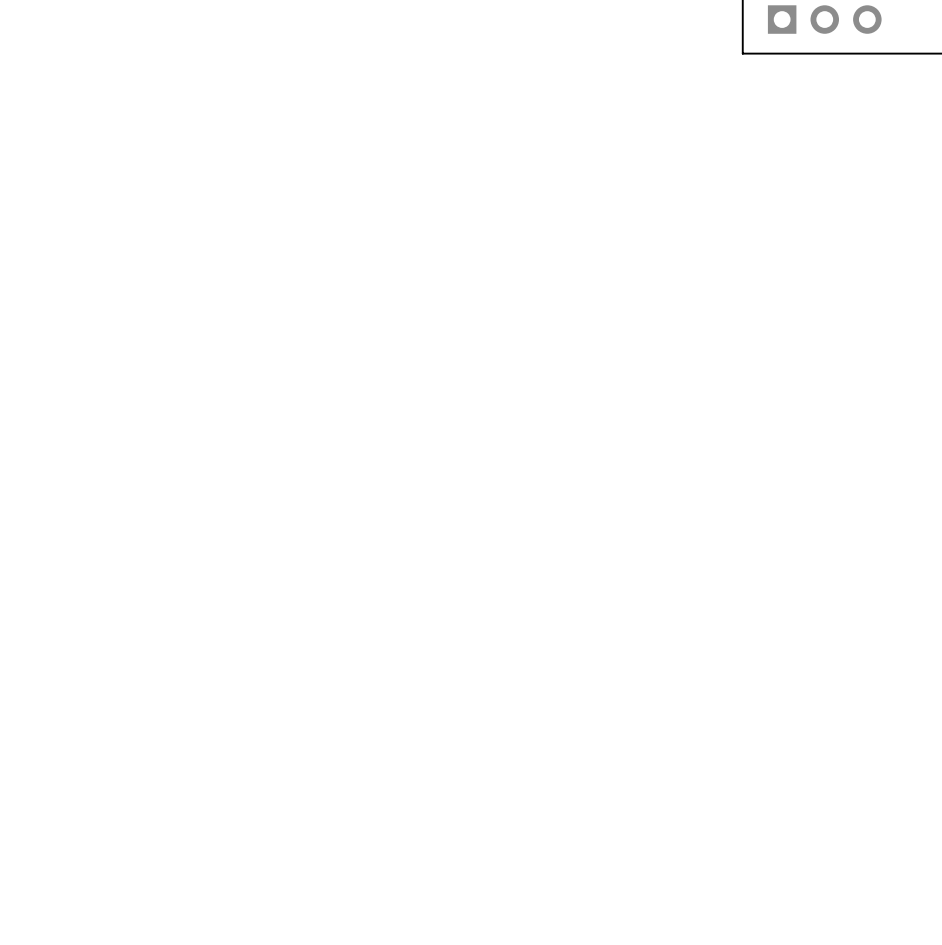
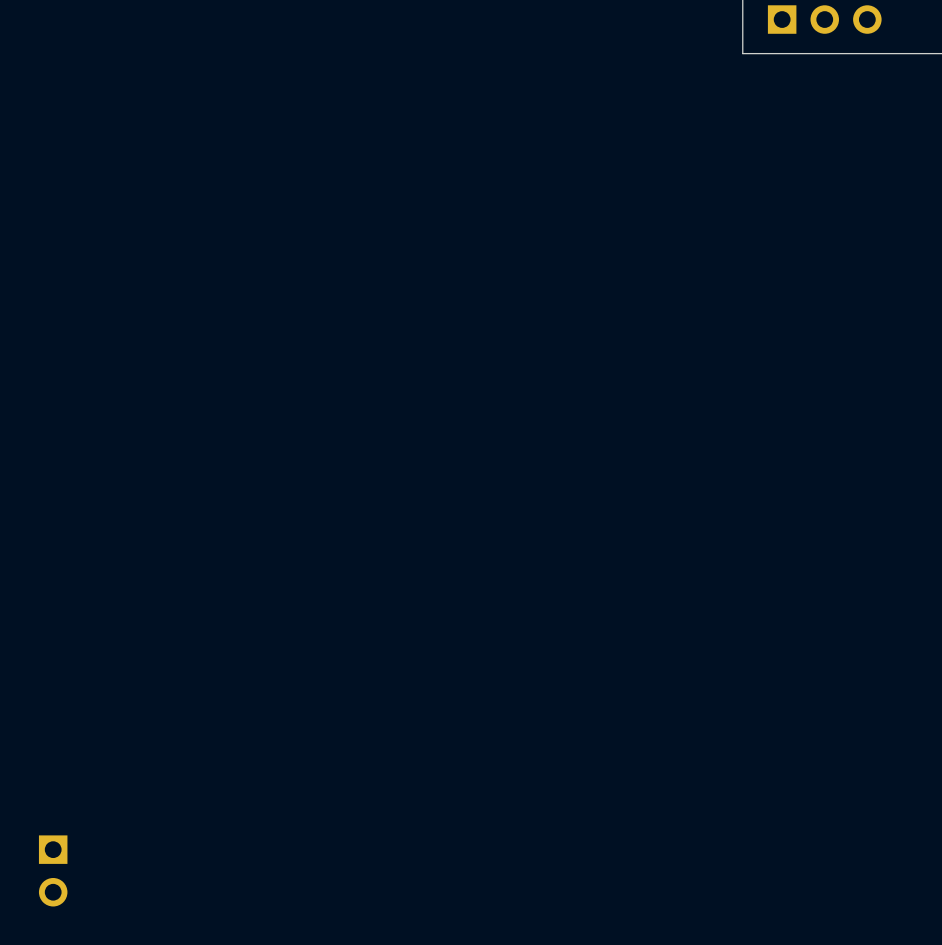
part: none -> (53, 870)

